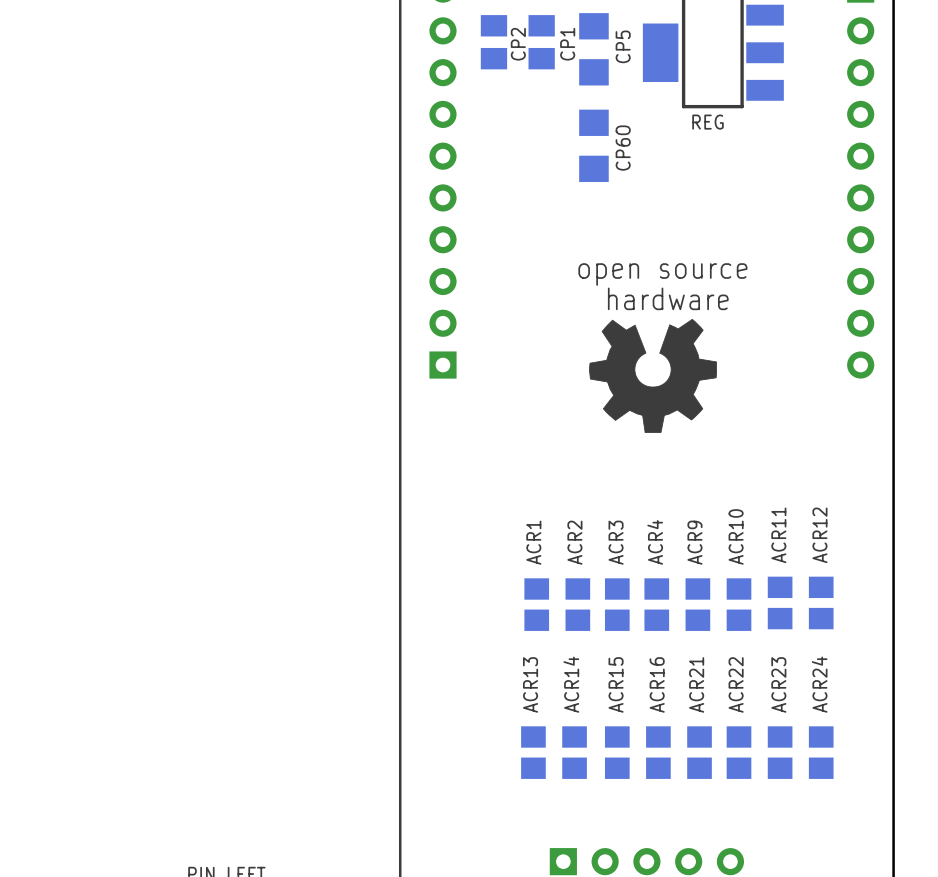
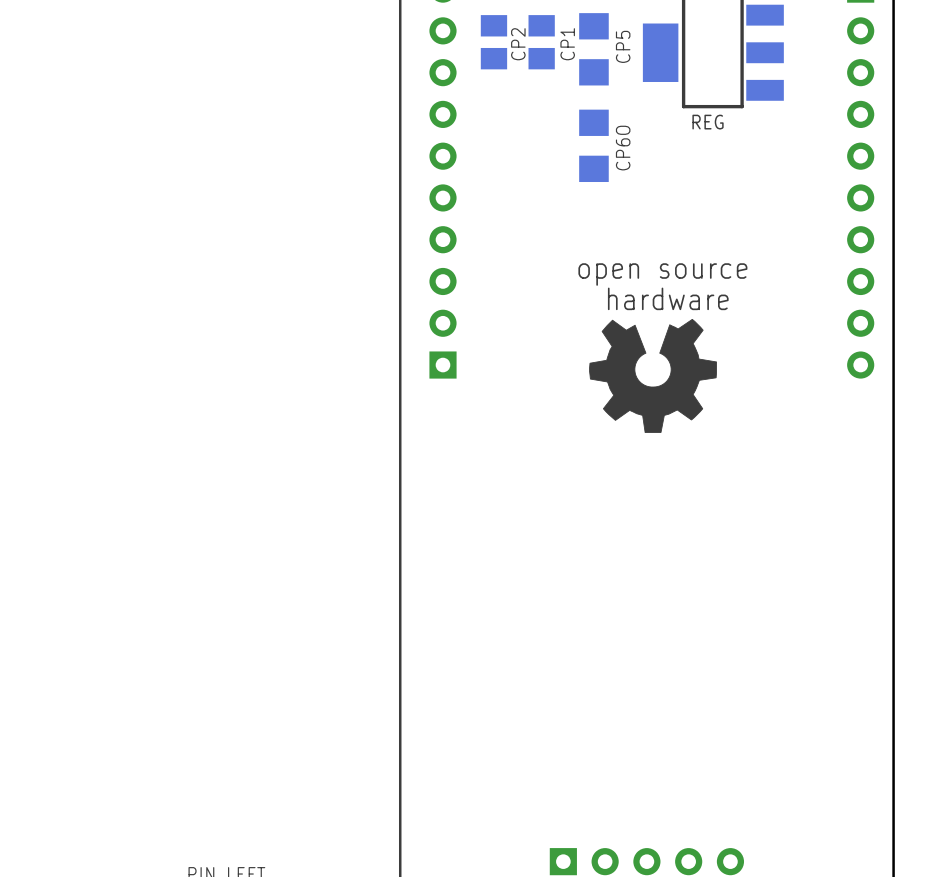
ACR11: (780, 602) -> none
ACR12: (821, 602) -> none
ACR1: (536, 604) -> none
ACR2: (577, 604) -> none
ACR3: (617, 604) -> none
ACR4: (656, 604) -> none
ACR9: (697, 604) -> none
ACR10: (738, 604) -> none
ACR13: (533, 752) -> none
ACR14: (574, 752) -> none
ACR15: (617, 752) -> none
ACR16: (658, 752) -> none
ACR21: (699, 752) -> none
ACR22: (738, 752) -> none
ACR23: (780, 752) -> none
ACR24: (821, 752) -> none

